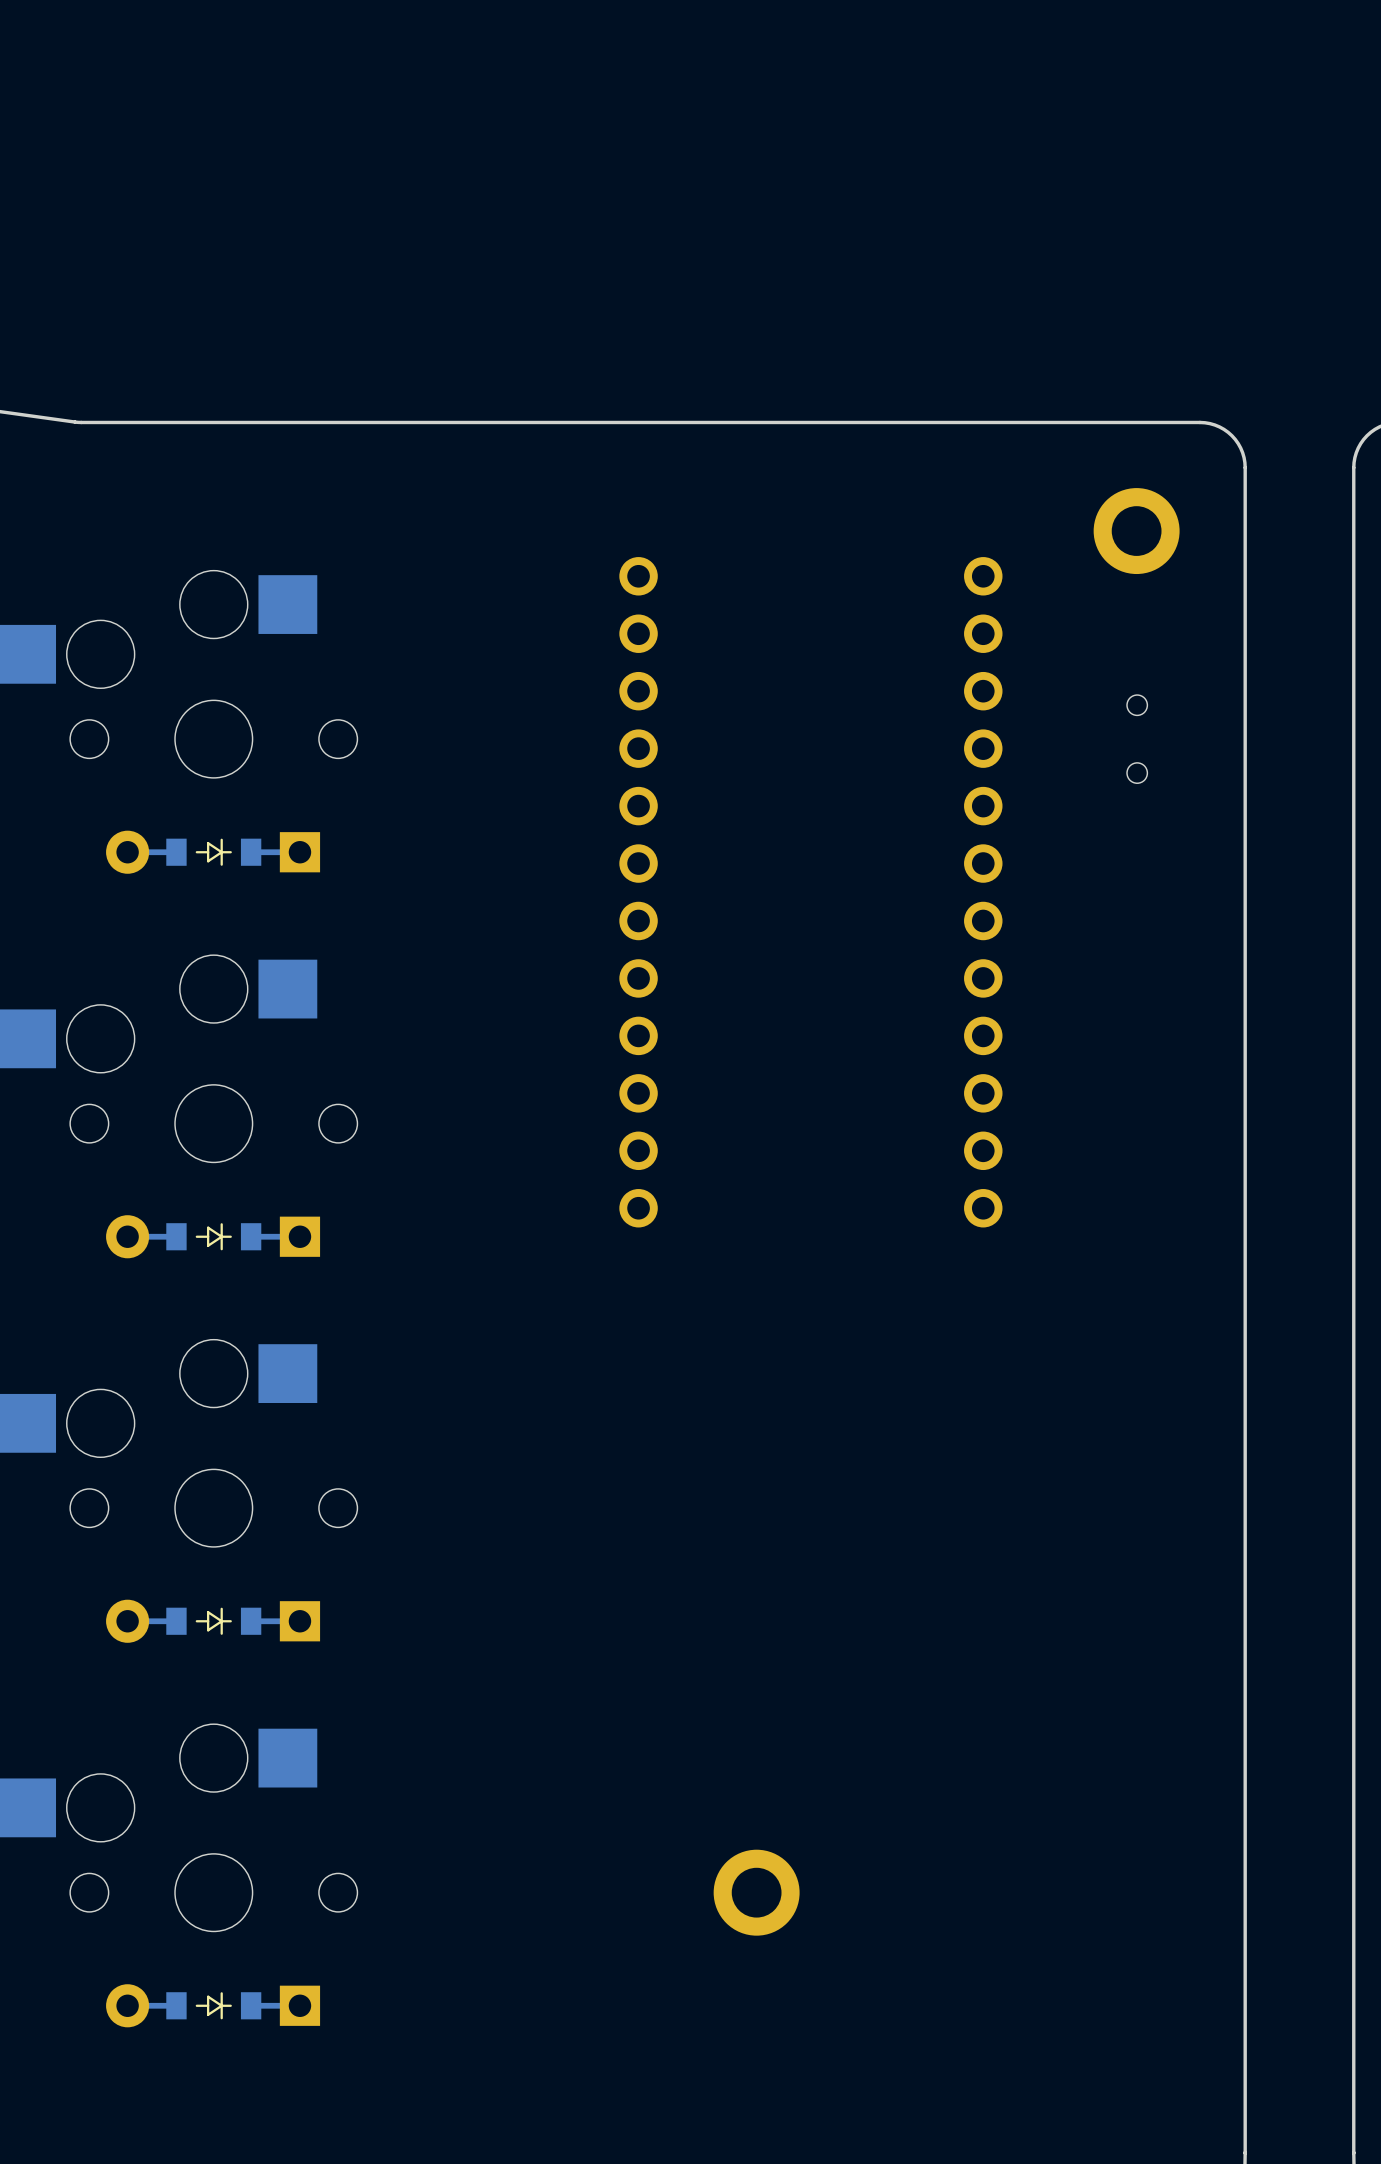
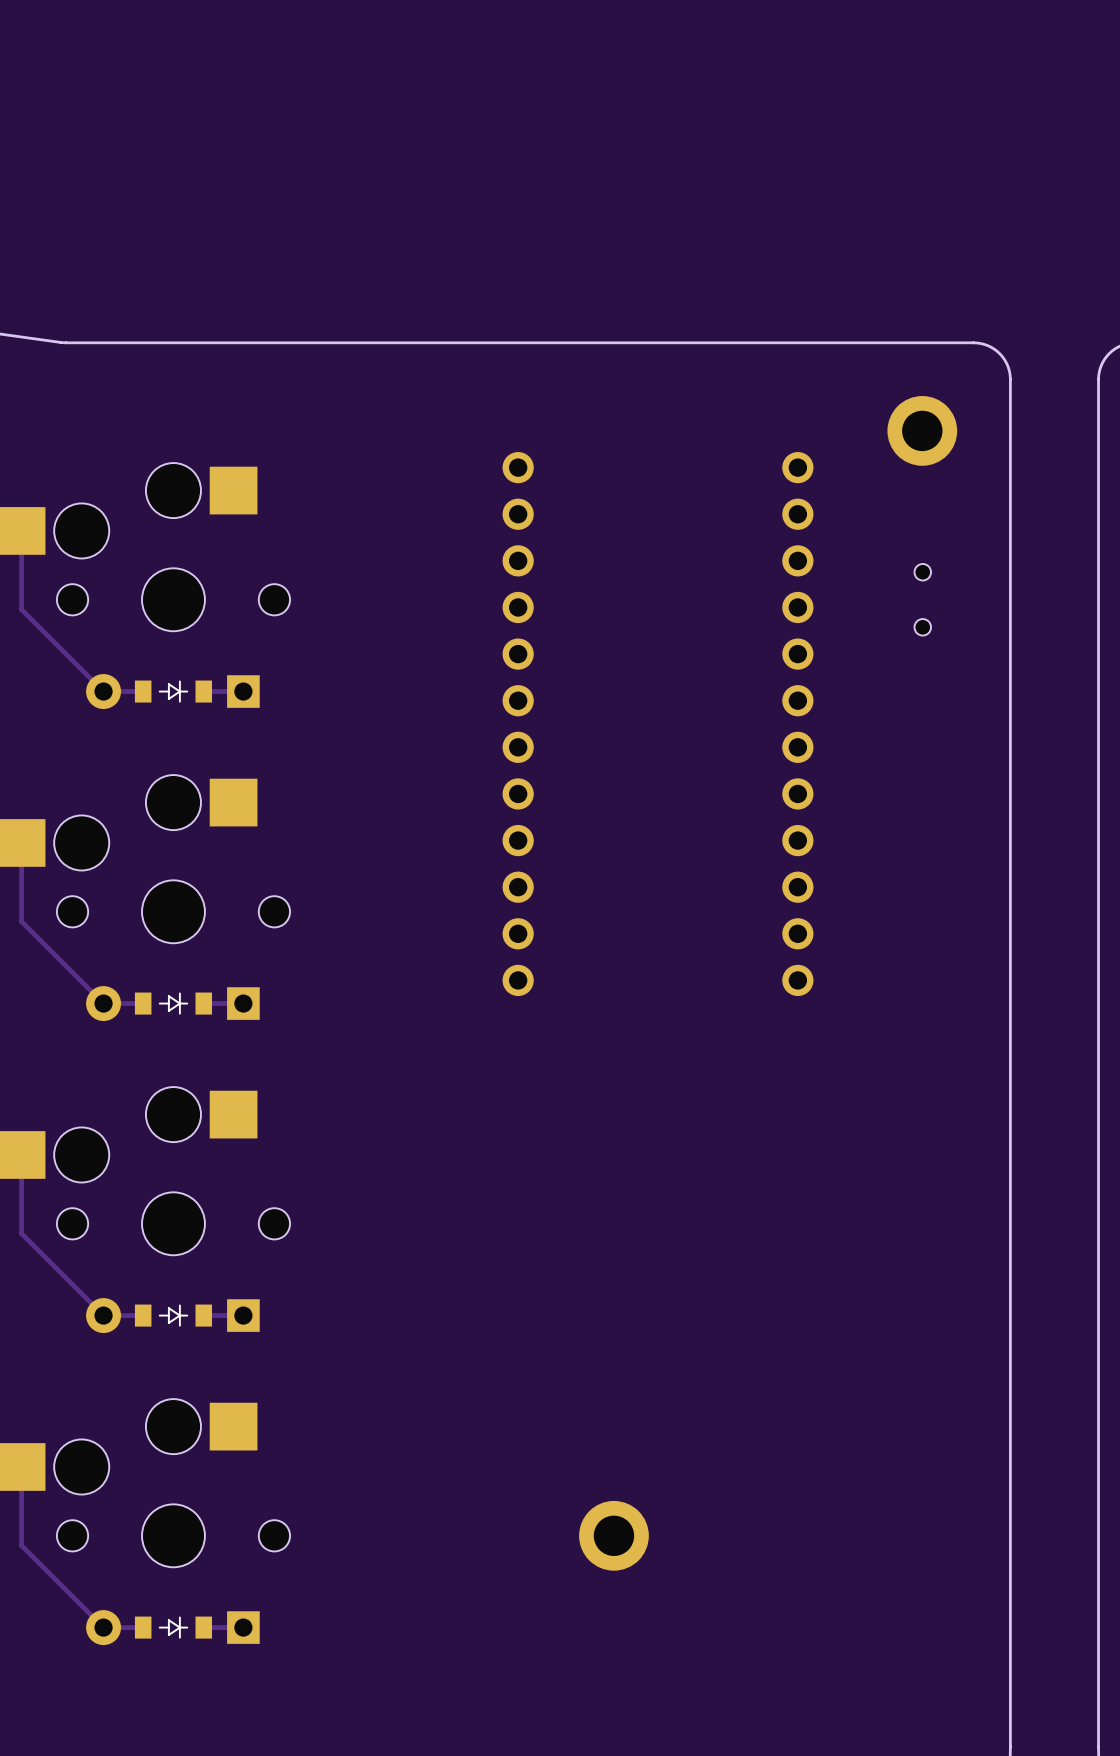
track: none -> (21, 530) (21, 609) (103, 691)
track: none -> (21, 842) (21, 921) (103, 1003)
track: none -> (21, 1154) (21, 1233) (103, 1315)
track: none -> (21, 1466) (21, 1545) (103, 1627)

